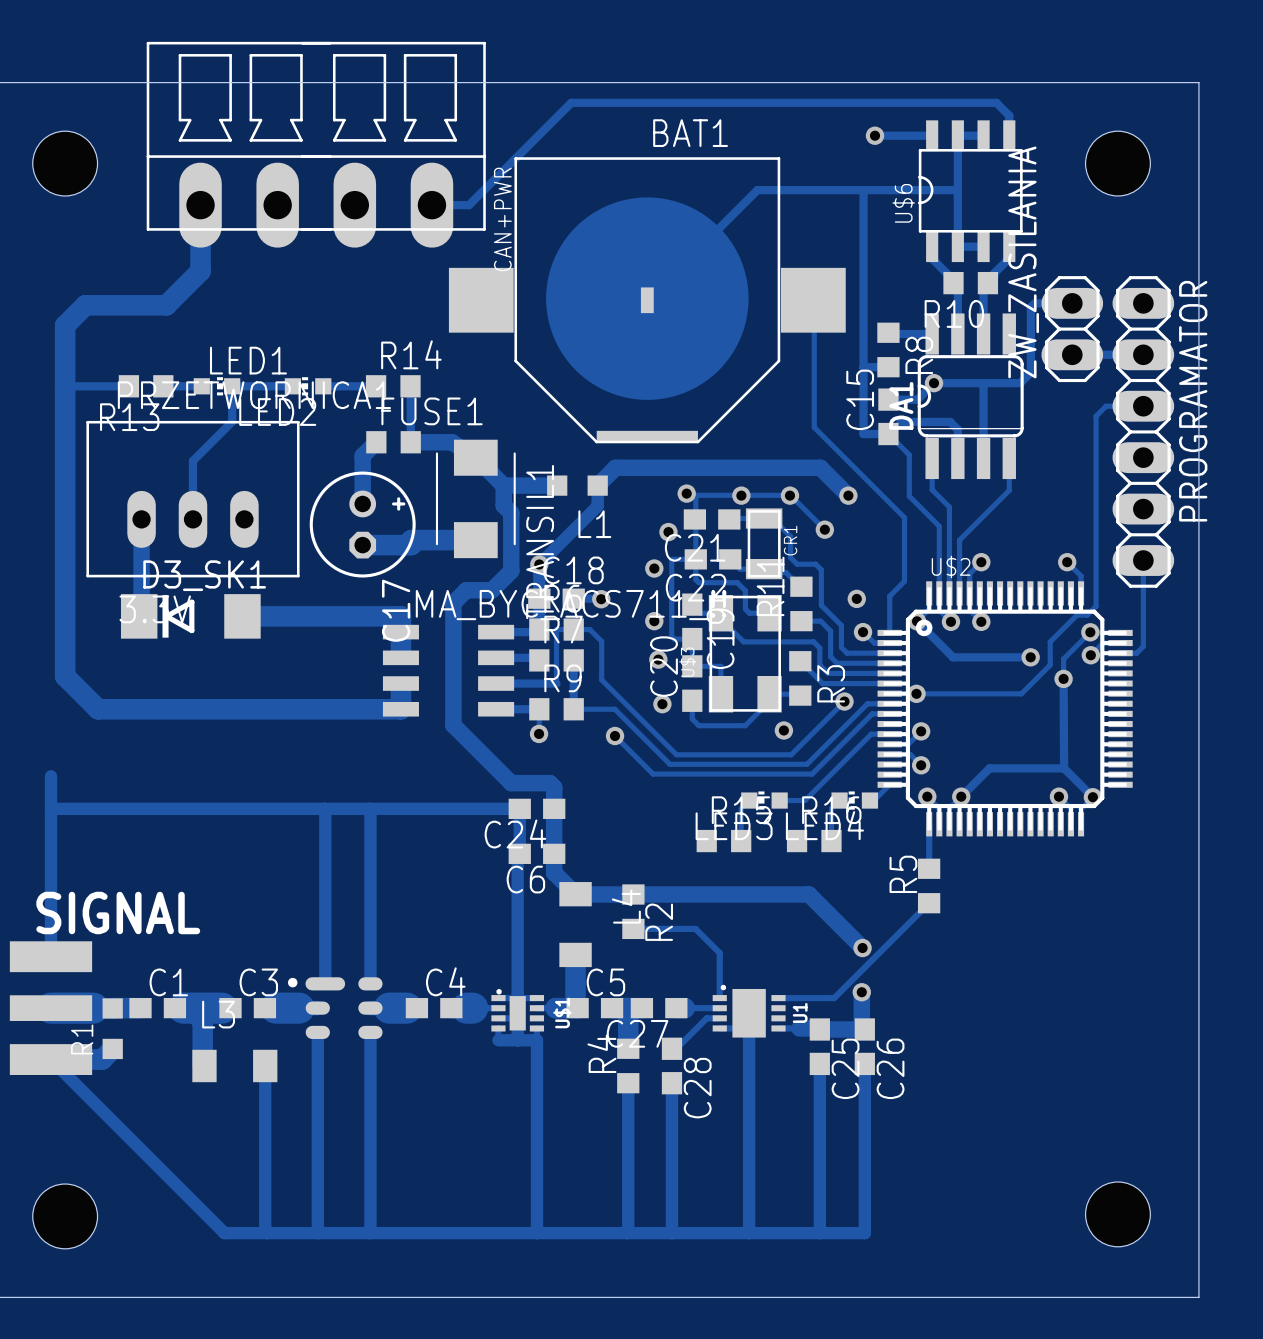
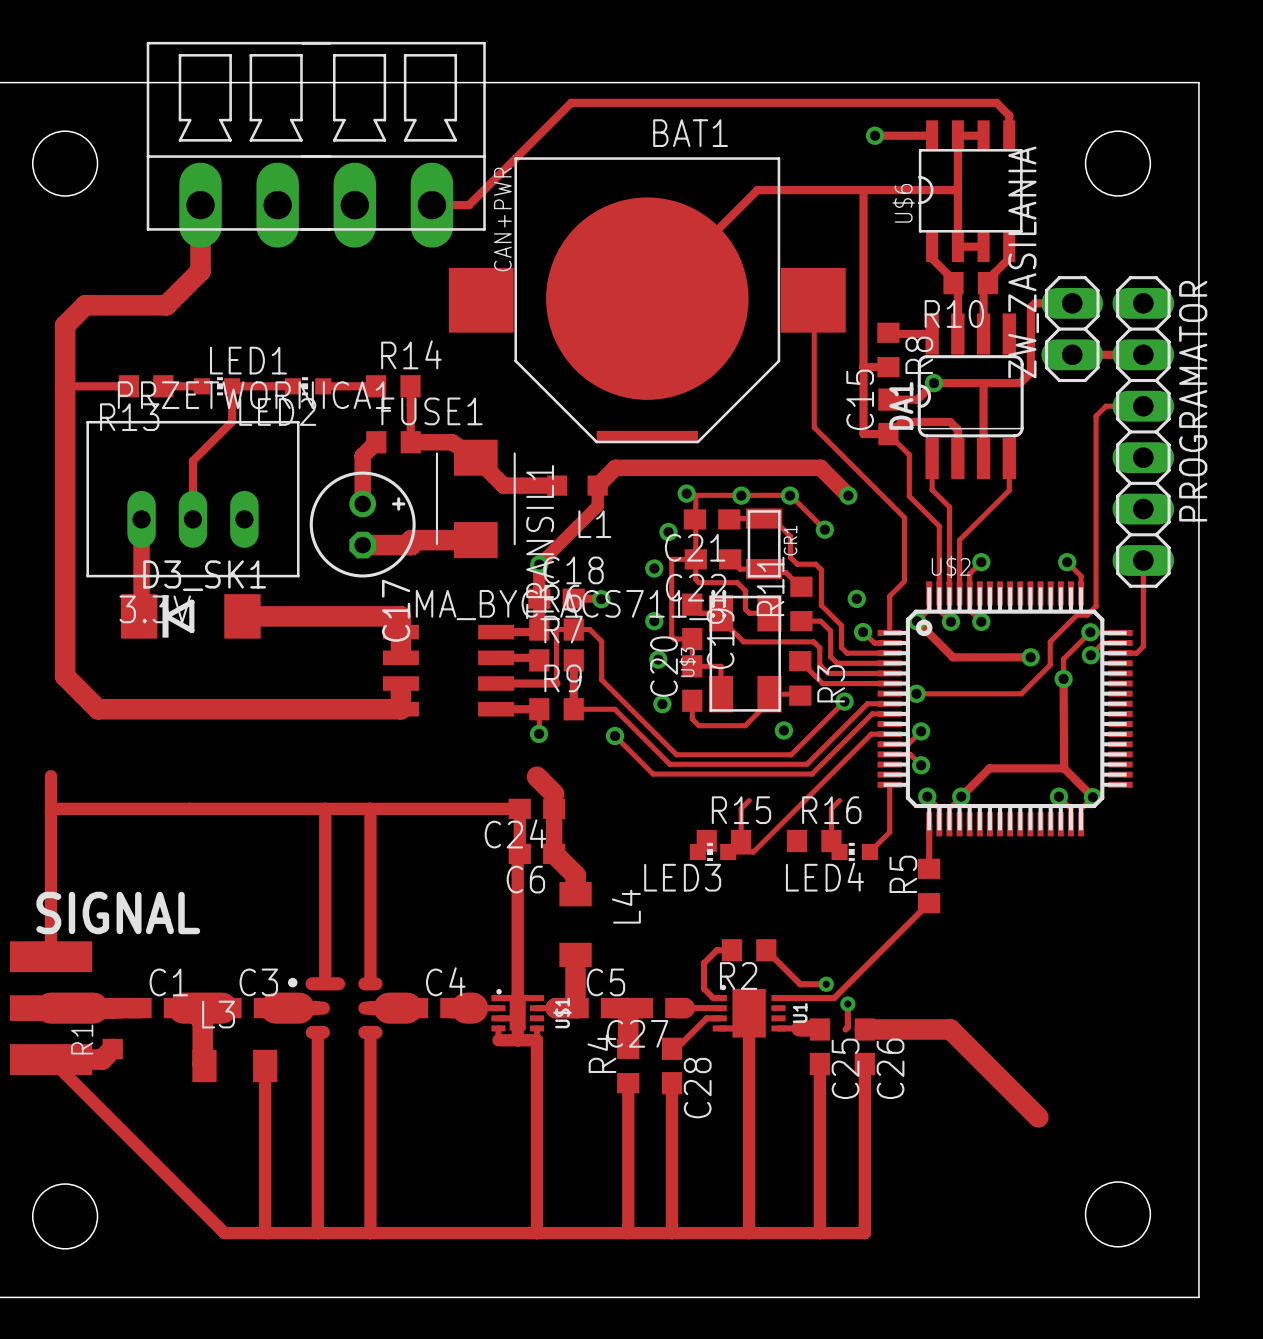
track: (503, 485) (503, 505) (511, 513) (511, 571) (491, 590) (466, 590) (453, 603) (453, 725) (511, 783) (549, 783) (554, 787) (554, 793) -> (536, 776) (554, 793)
track: (889, 784) (873, 800) (869, 800) -> (889, 784) (889, 832) (869, 851)
LED3 position: (764, 800) -> (713, 851)
track: (779, 800) (804, 800) -> (728, 851) (753, 851) (804, 800)
LED4 position: (854, 800) -> (854, 851)
track: (554, 853) (554, 872) (575, 894) (809, 894) (862, 948) -> (554, 853) (575, 875) (575, 894)
R2 rotation: 0° (633, 911) -> 90° clockwise (749, 950)
R2 position: (633, 911) -> (749, 950)
track: (633, 928) (695, 928) (719, 953) (719, 998) -> (731, 950) (716, 950) (704, 963) (704, 988) (713, 998) (719, 998)
via: (862, 948) -> none
track: none -> (766, 950) (800, 984) (826, 984)
via: none -> (826, 984)
track: (861, 992) (861, 1026) (864, 1029) (819, 1029) -> none
via position: (861, 992) -> (847, 1004)
track: none -> (847, 1004) (847, 1027) (845, 1029)
track: none -> (864, 1029) (950, 1029) (1038, 1117)

